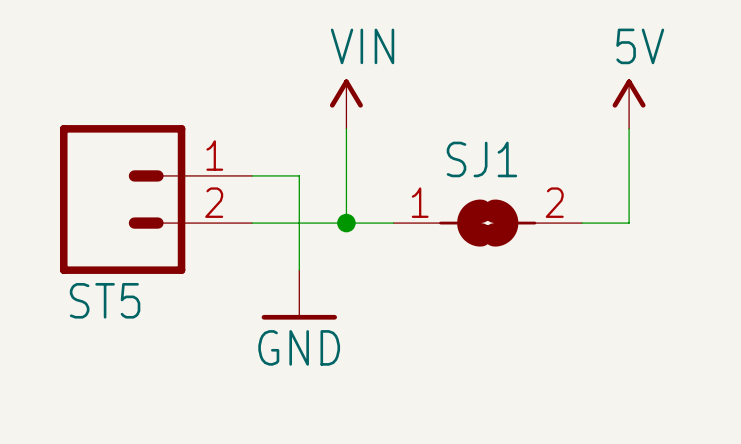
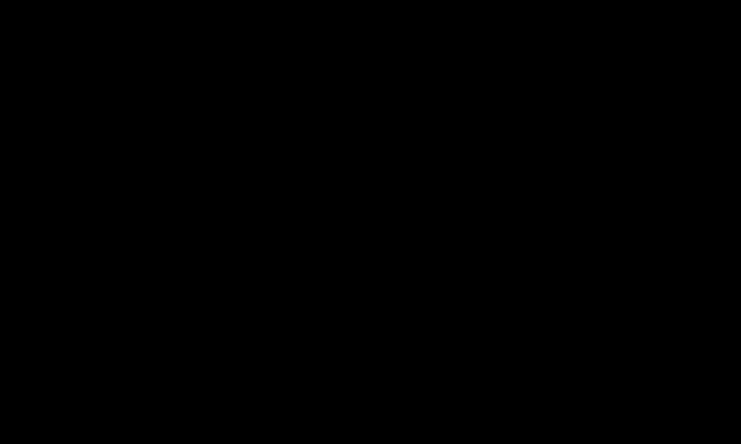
power symbol: VIN (346, 104) -> none
power symbol: 5V (629, 104) -> none
wire: (346, 128) (346, 223) -> none
wire: (629, 128) (629, 223) (581, 223) -> none
wire: (252, 175) (299, 175) (299, 270) -> none
ST5: (156, 199) -> none
wire: (252, 223) (393, 223) -> none
junction: (346, 223) -> none
SJ1: (487, 223) -> none
power symbol: GND (299, 294) -> none

